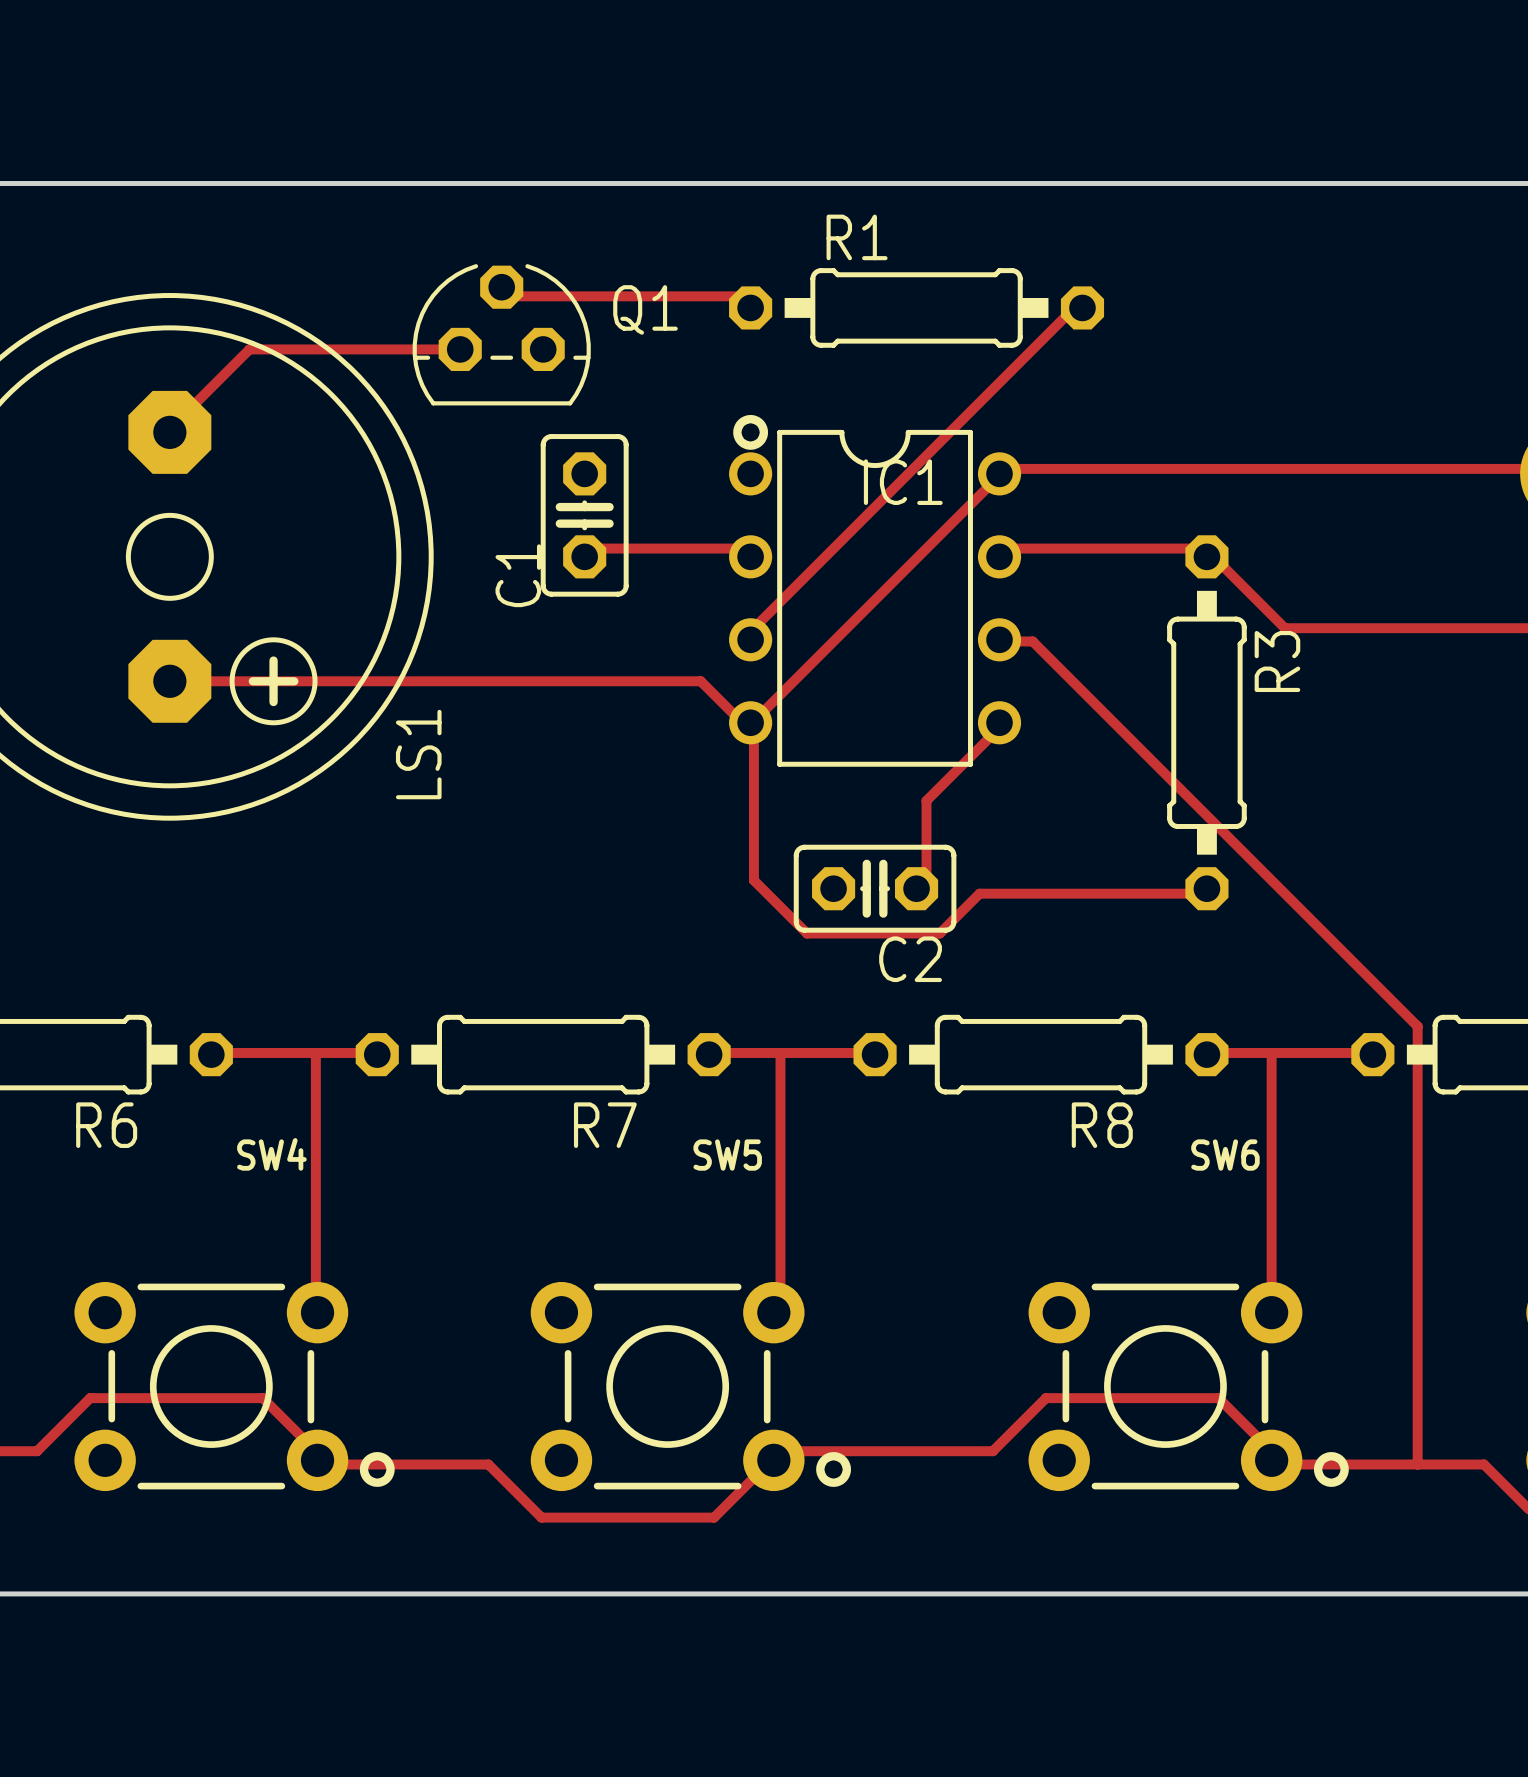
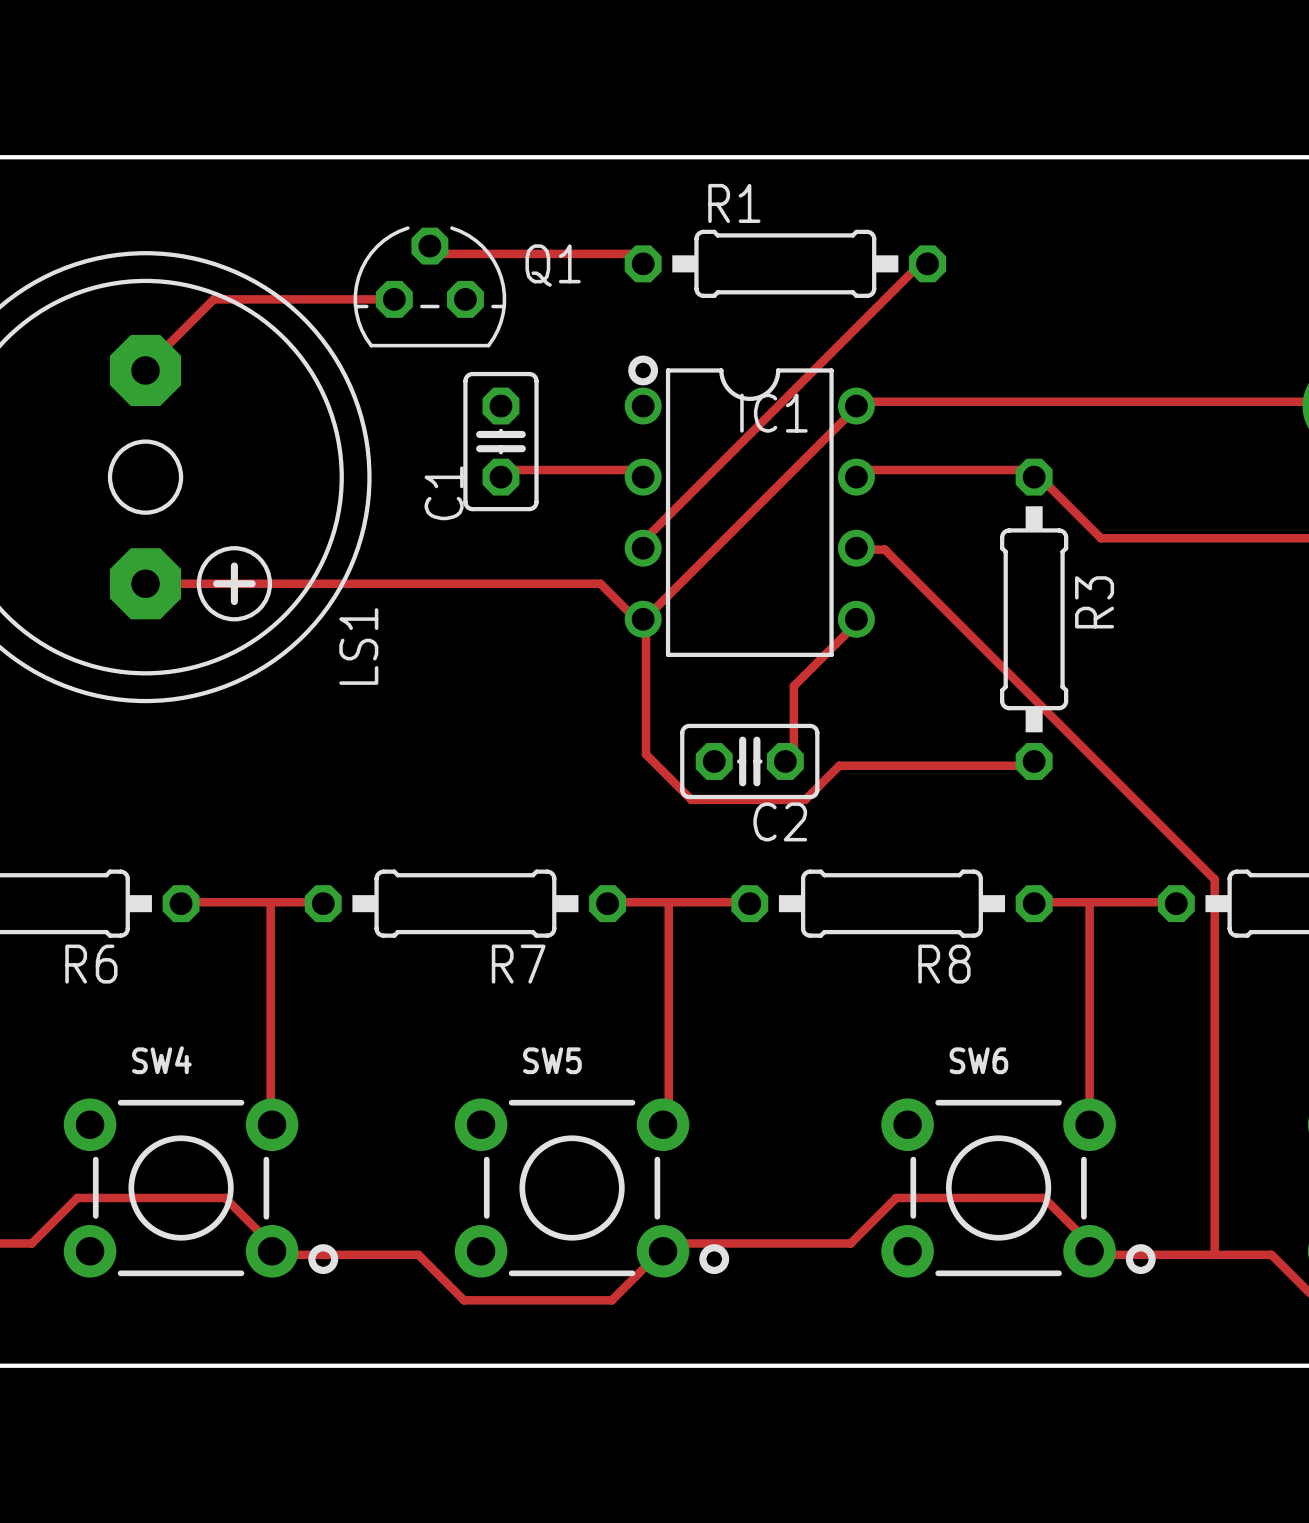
R3 name position: R3 (1277, 661) -> R3 (1094, 602)
SW4 name position: SW4 (271, 1154) -> SW4 (161, 1060)
SW5 name position: SW5 (727, 1155) -> SW5 (552, 1060)
SW6 name position: SW6 (1225, 1155) -> SW6 (978, 1060)

